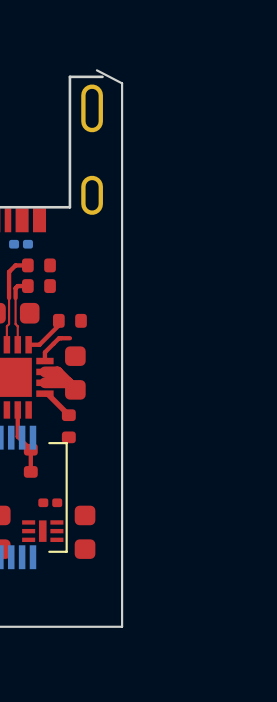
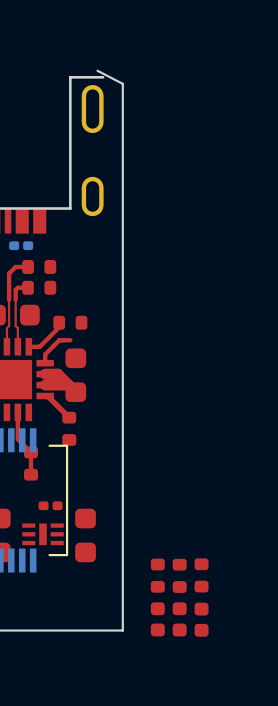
part: none -> (157, 575)
part: none -> (179, 575)
part: none -> (201, 575)
part: none -> (157, 619)
part: none -> (179, 619)
part: none -> (201, 619)

